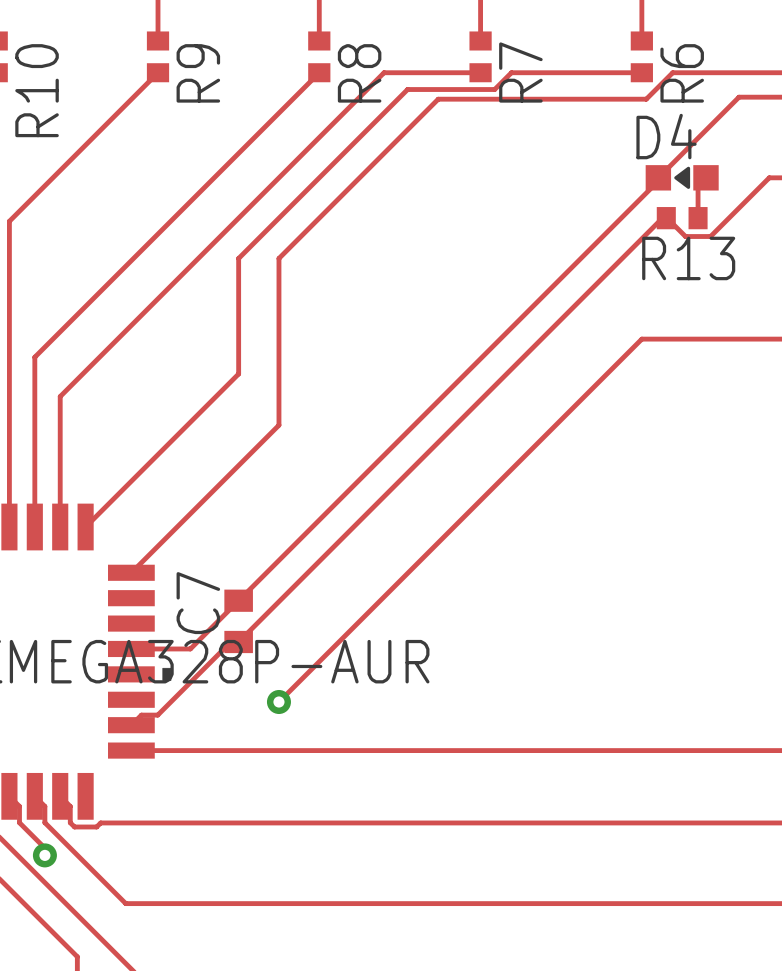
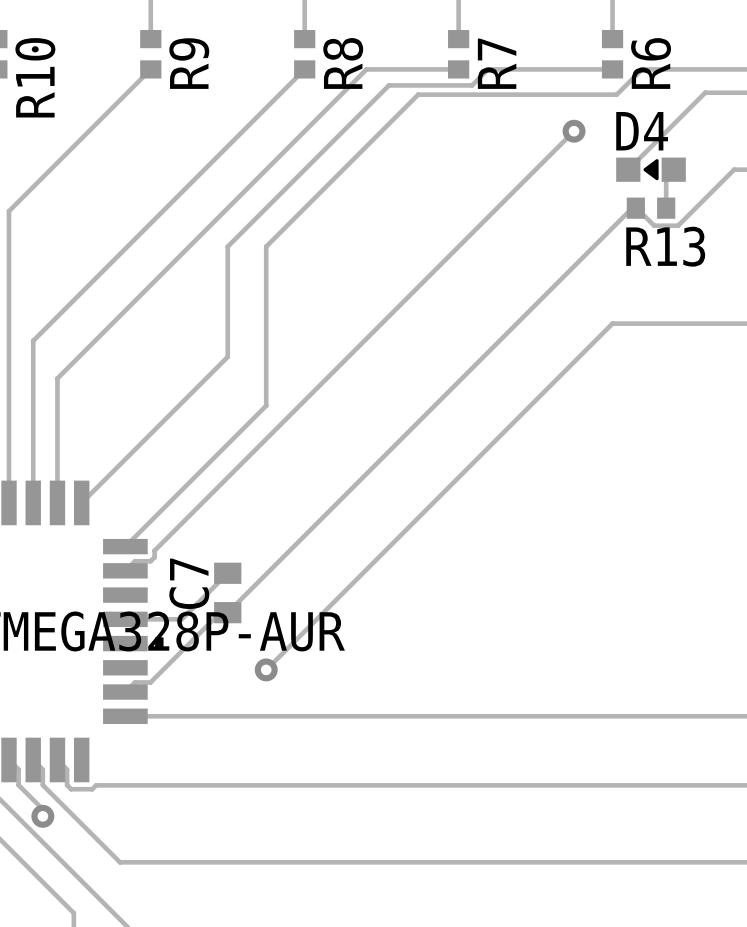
track: none -> (574, 131) (154, 550) (154, 557) (150, 561) (135, 561) (125, 570)
via: none -> (574, 131)
track: (658, 180) (238, 600) -> none

